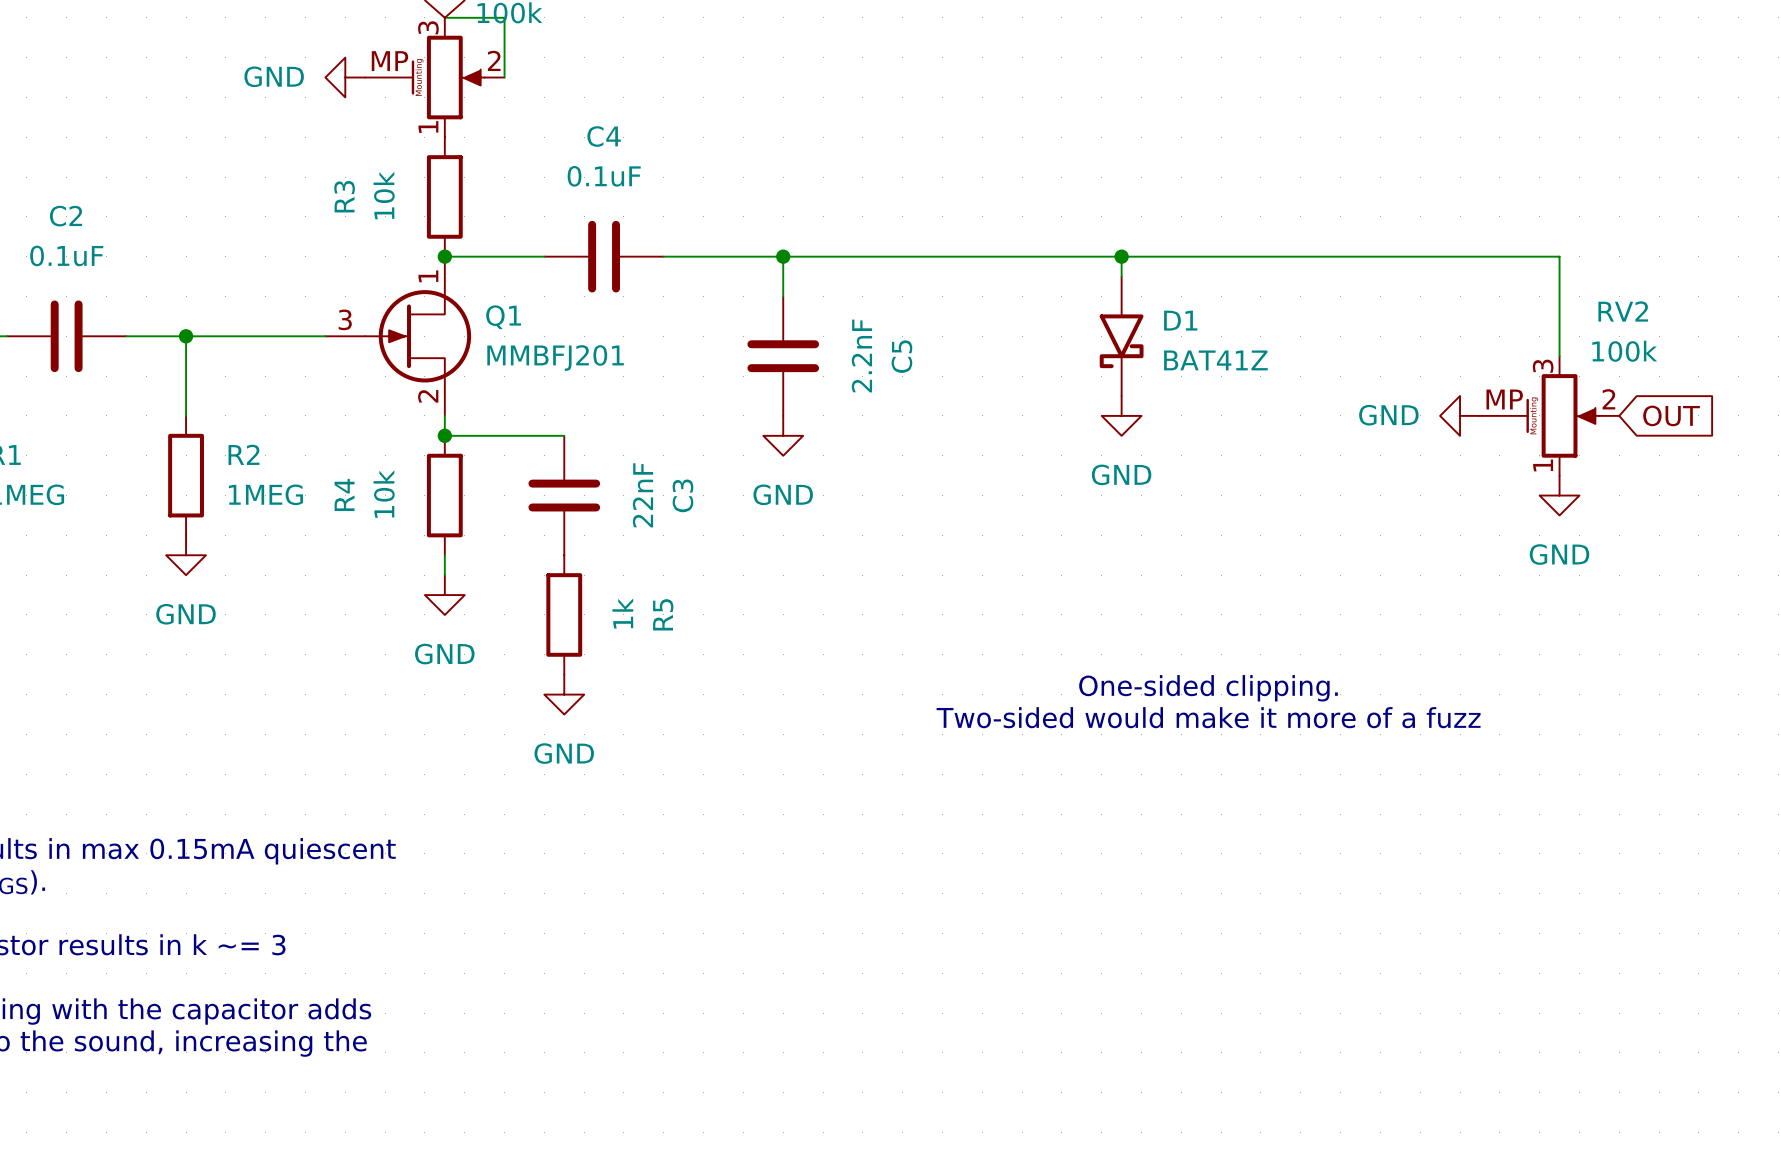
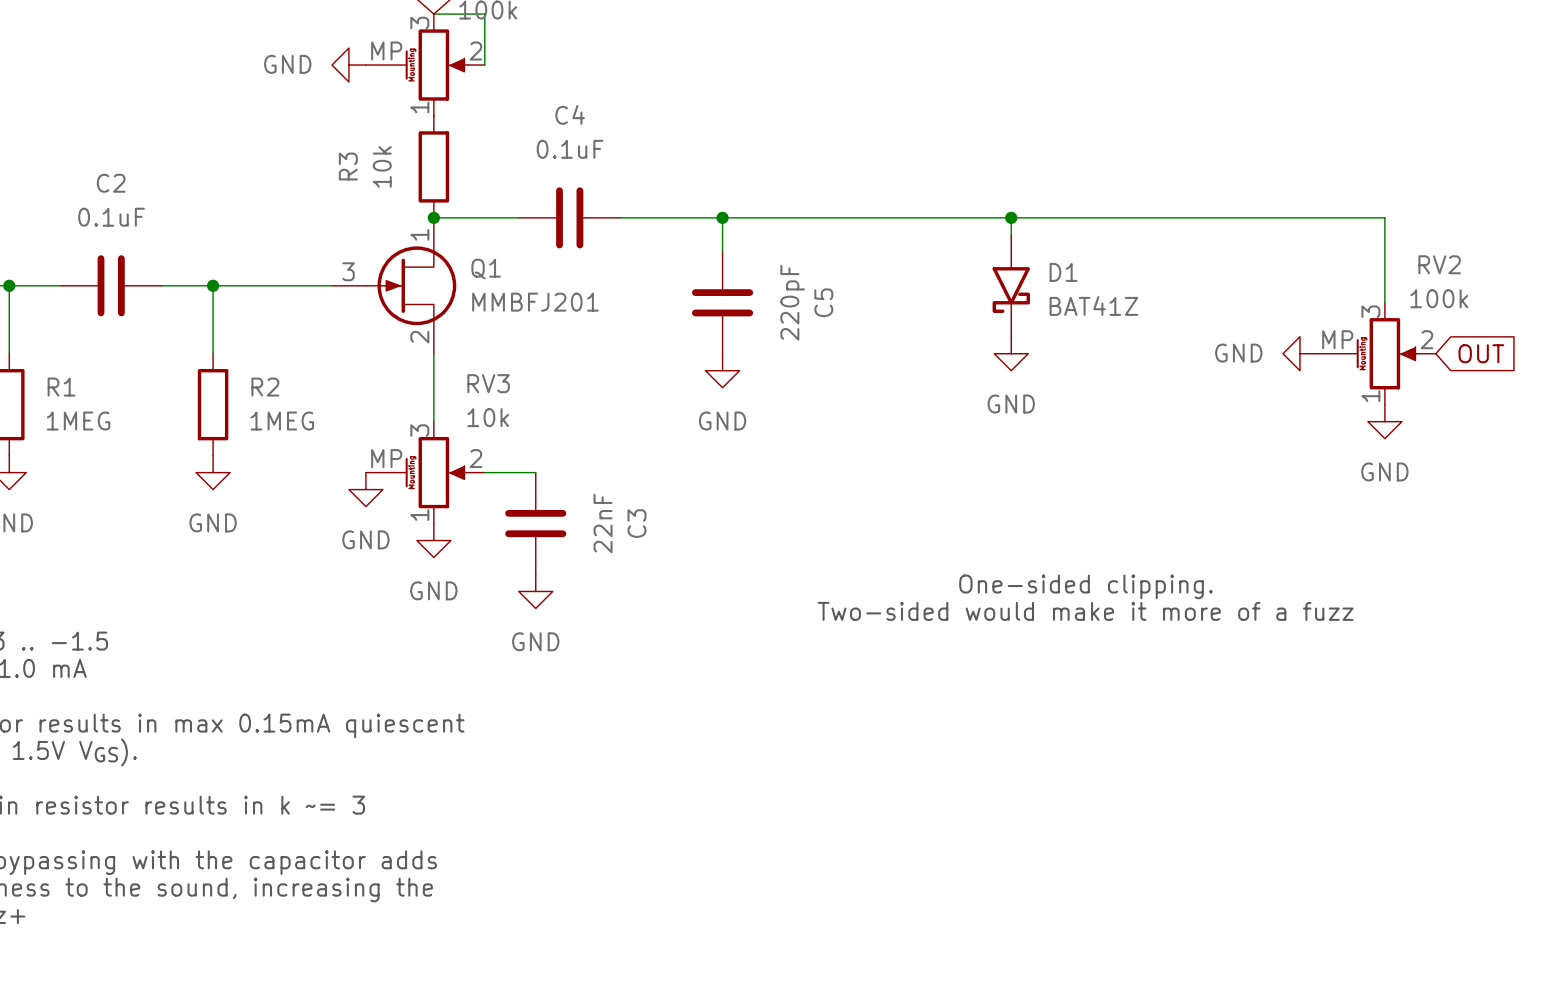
C5 value: 2.2nF (861, 355) -> 220pF (792, 302)
wire: (444, 435) (564, 435) -> (433, 370) (433, 421)
junction: (444, 435) -> none
R4: 10k (444, 495) -> none
C3 position: (564, 495) -> (535, 523)
RV3: none -> 10k (425, 472)
wire: (444, 555) (444, 575) -> none
wire: none -> (484, 472) (535, 472)
power symbol: none -> GND (365, 489)
power symbol position: GND (444, 595) -> GND (433, 540)
R5: 1k (564, 614) -> none

